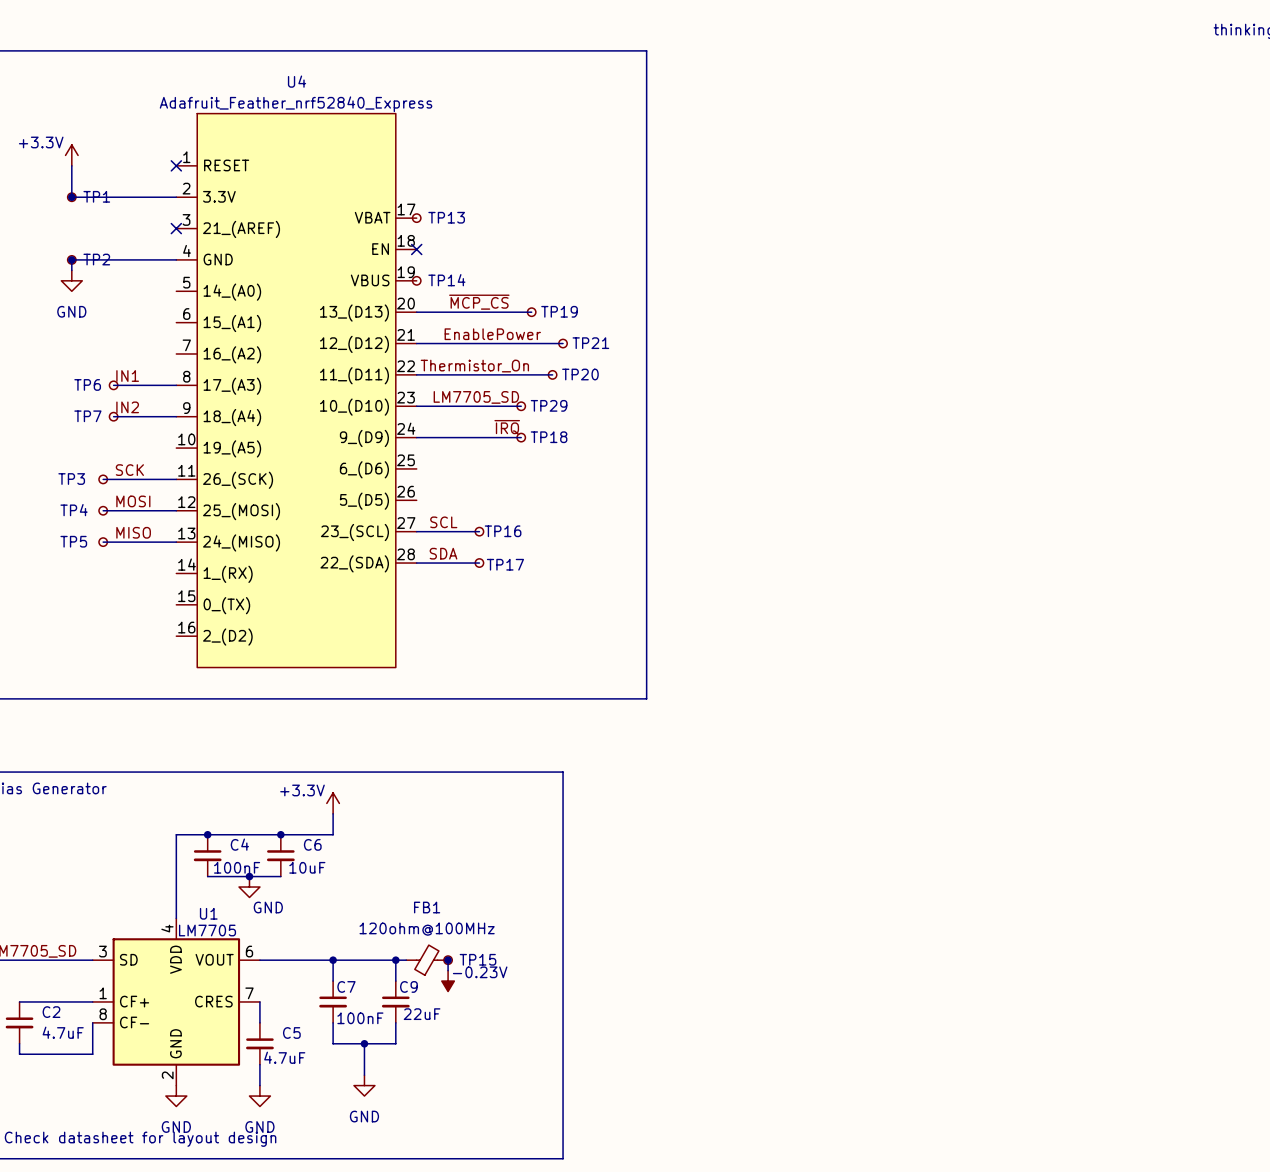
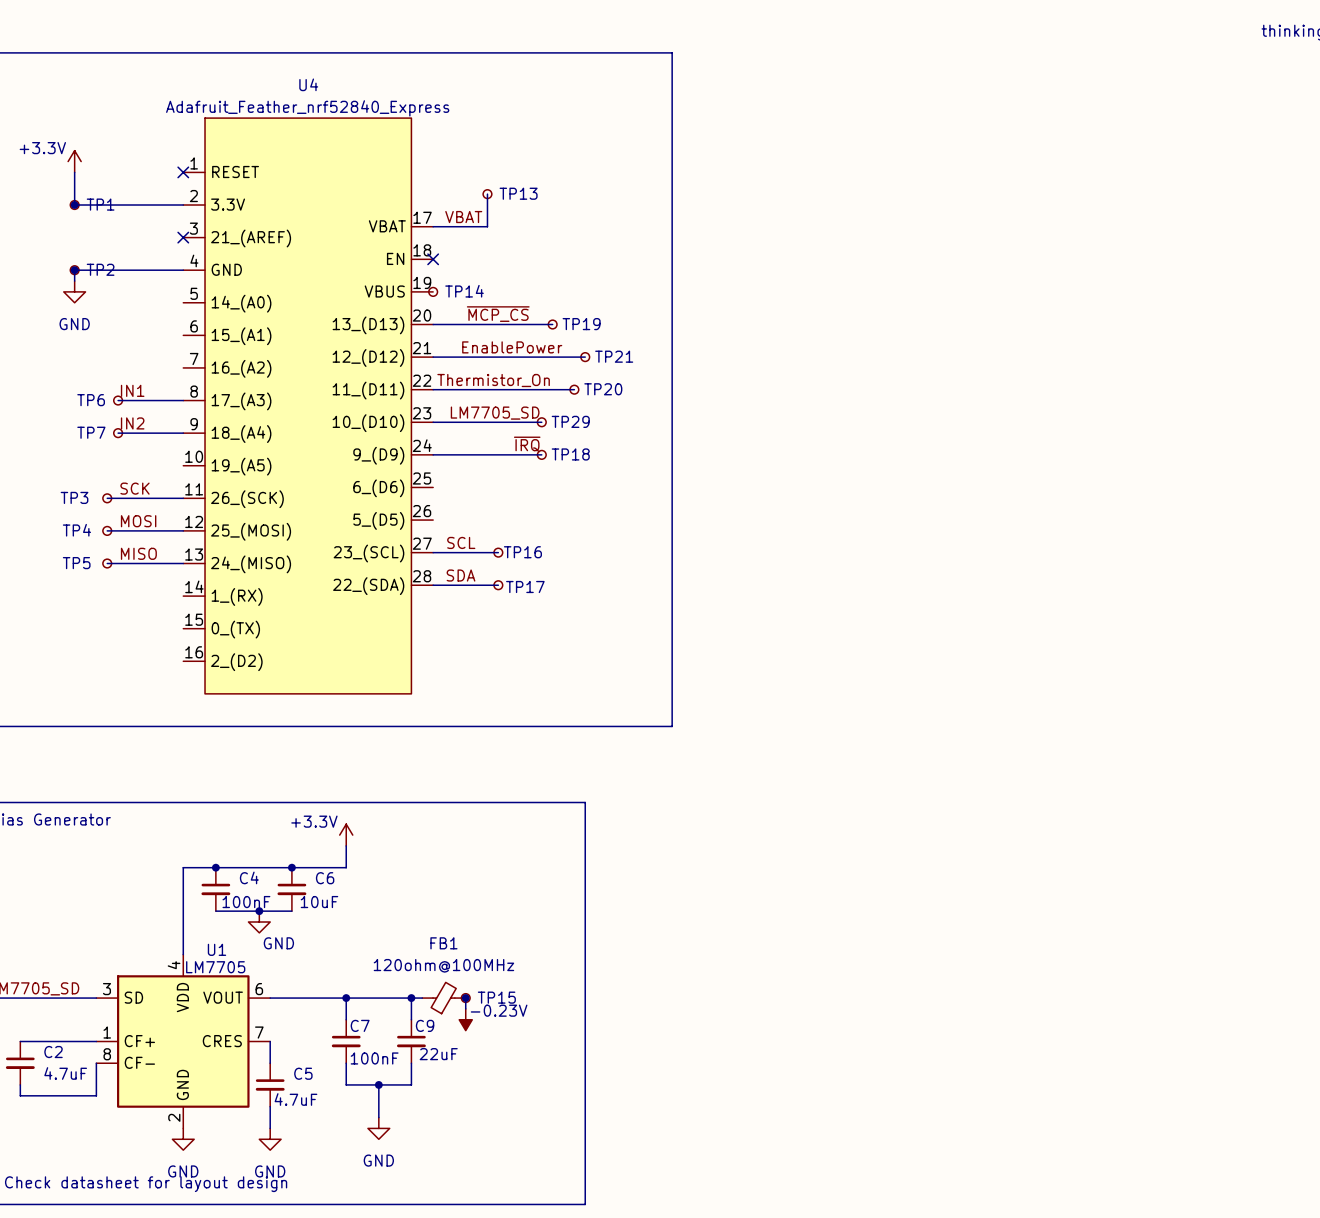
wire: none -> (487, 194) (487, 226) (433, 226)
label: none -> VBAT (463, 217)
TP13 position: (416, 218) -> (487, 194)

